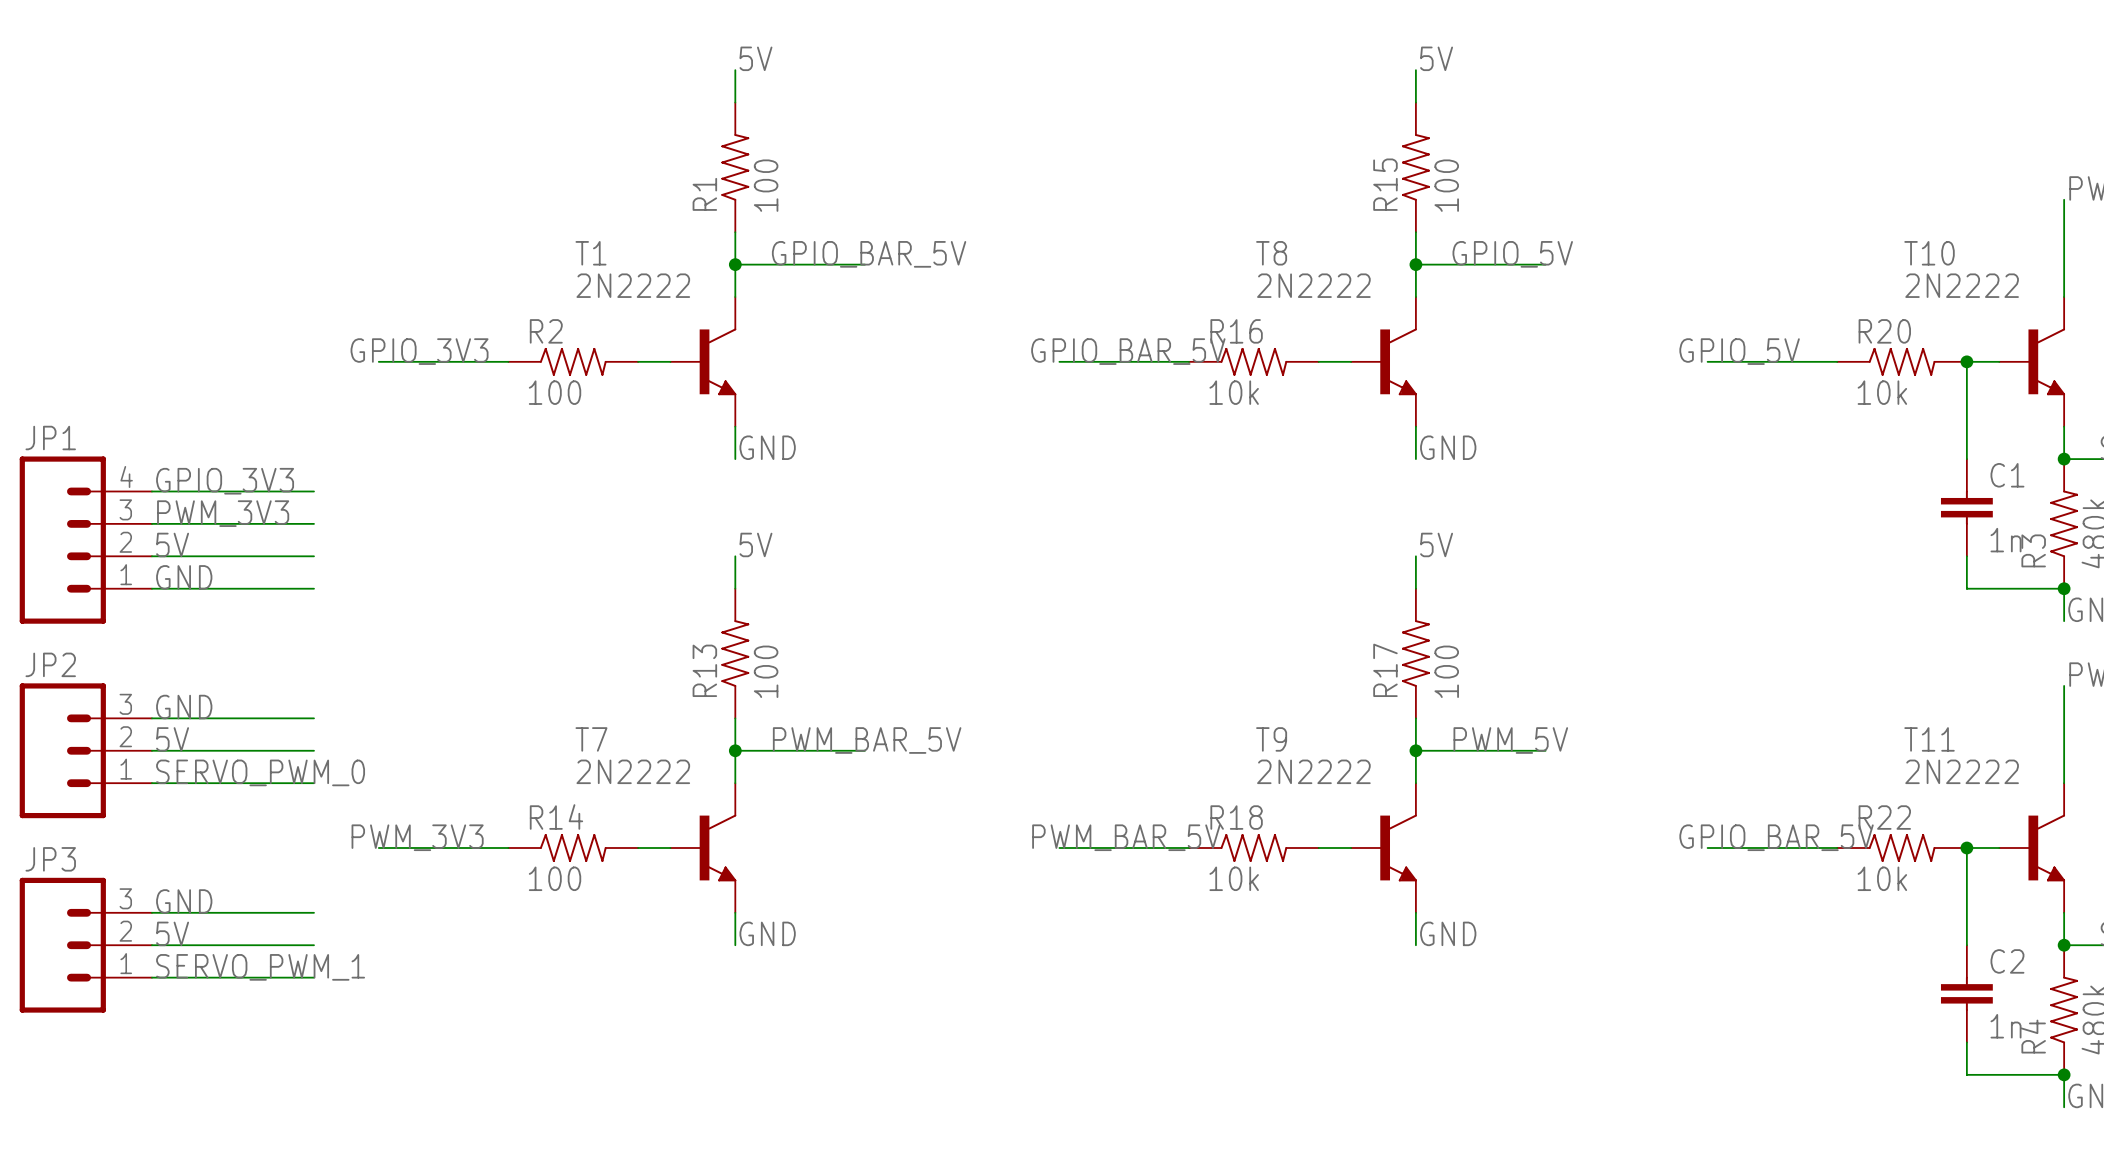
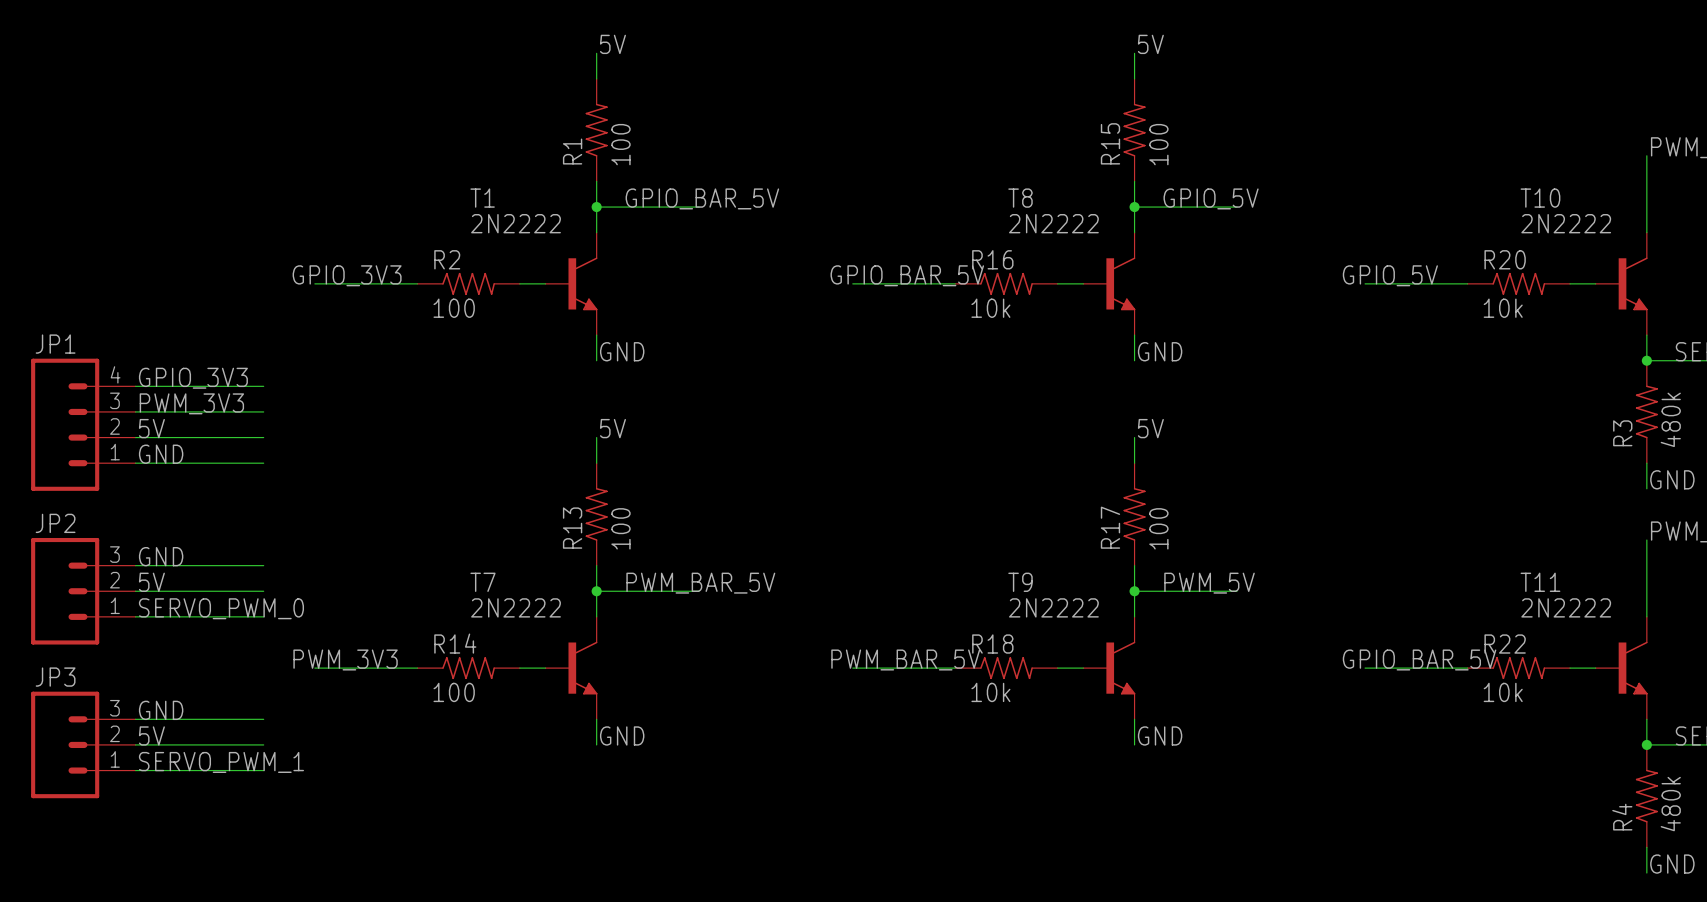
wire: (1966, 361) (1966, 459) -> none
junction: (1966, 361) -> none
C1: 1n (1966, 507) -> none
wire: (1966, 556) (1966, 588) (2064, 588) -> none
junction: (2064, 588) -> none
wire: (1966, 848) (1966, 945) -> none
junction: (1966, 848) -> none
C2: 1n (1966, 993) -> none
wire: (1966, 1042) (1966, 1074) (2064, 1074) -> none
junction: (2064, 1074) -> none

